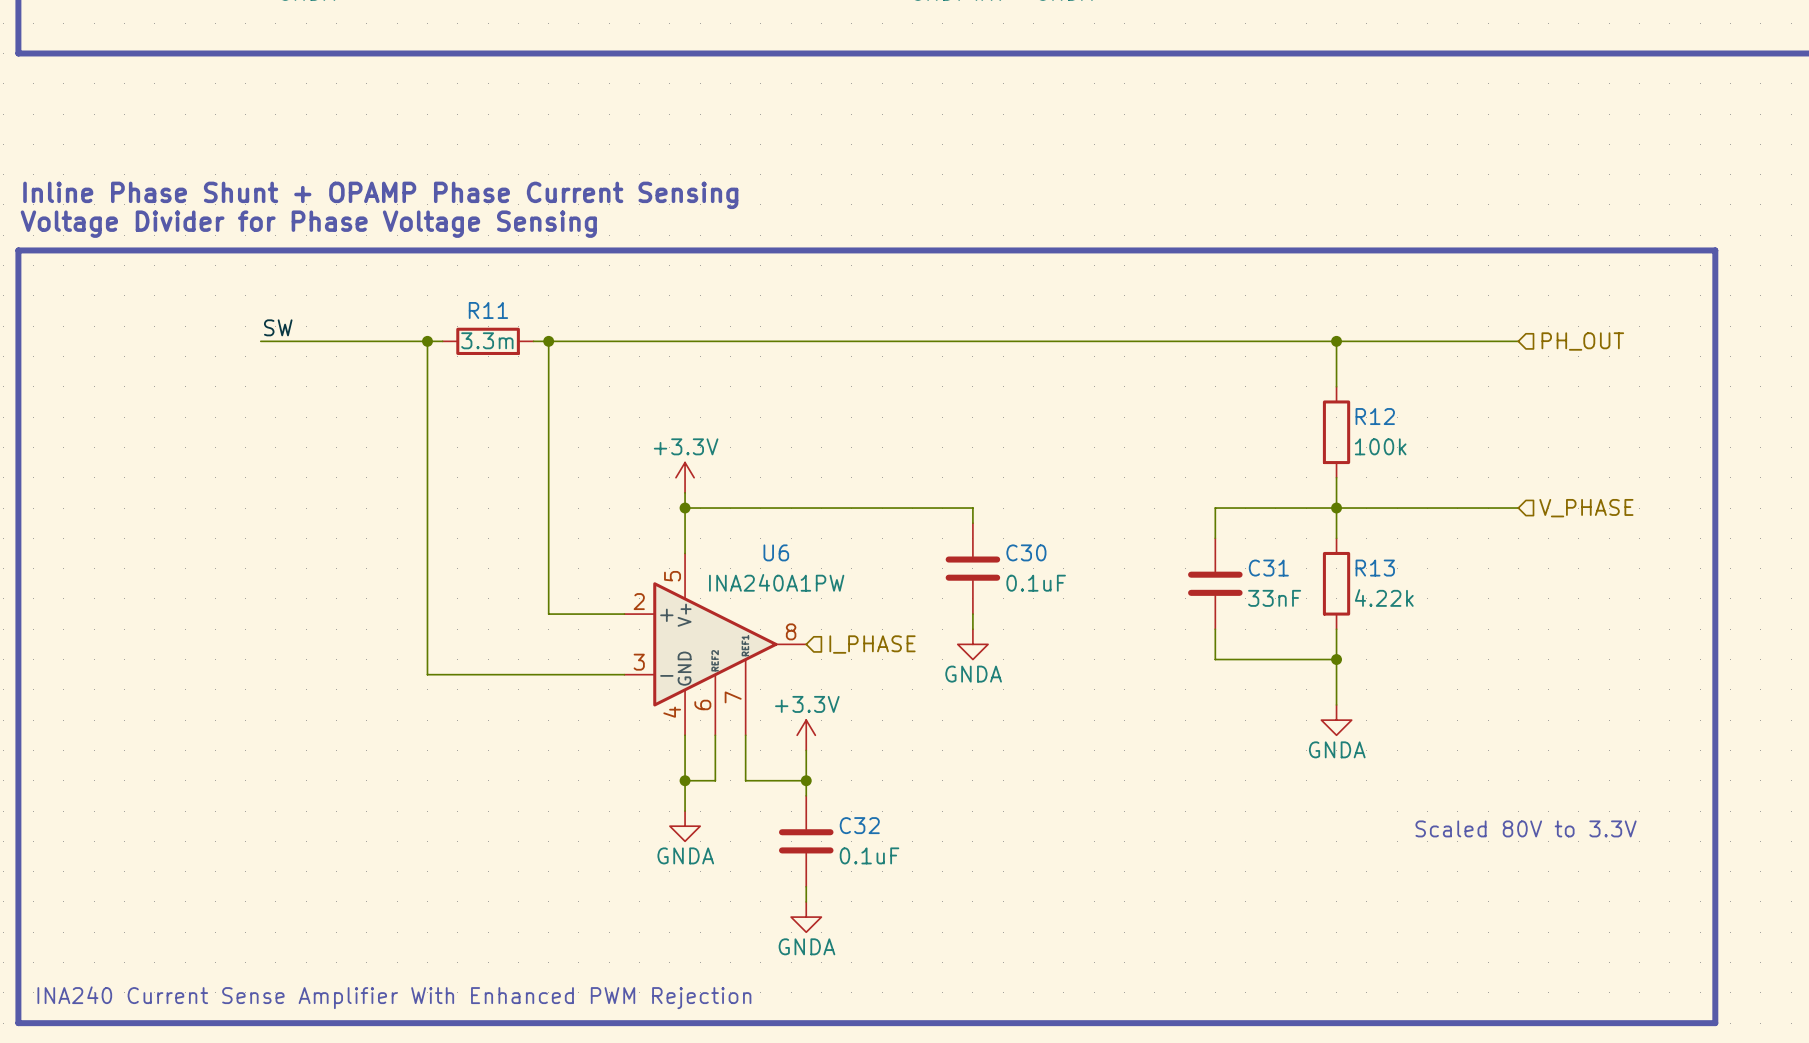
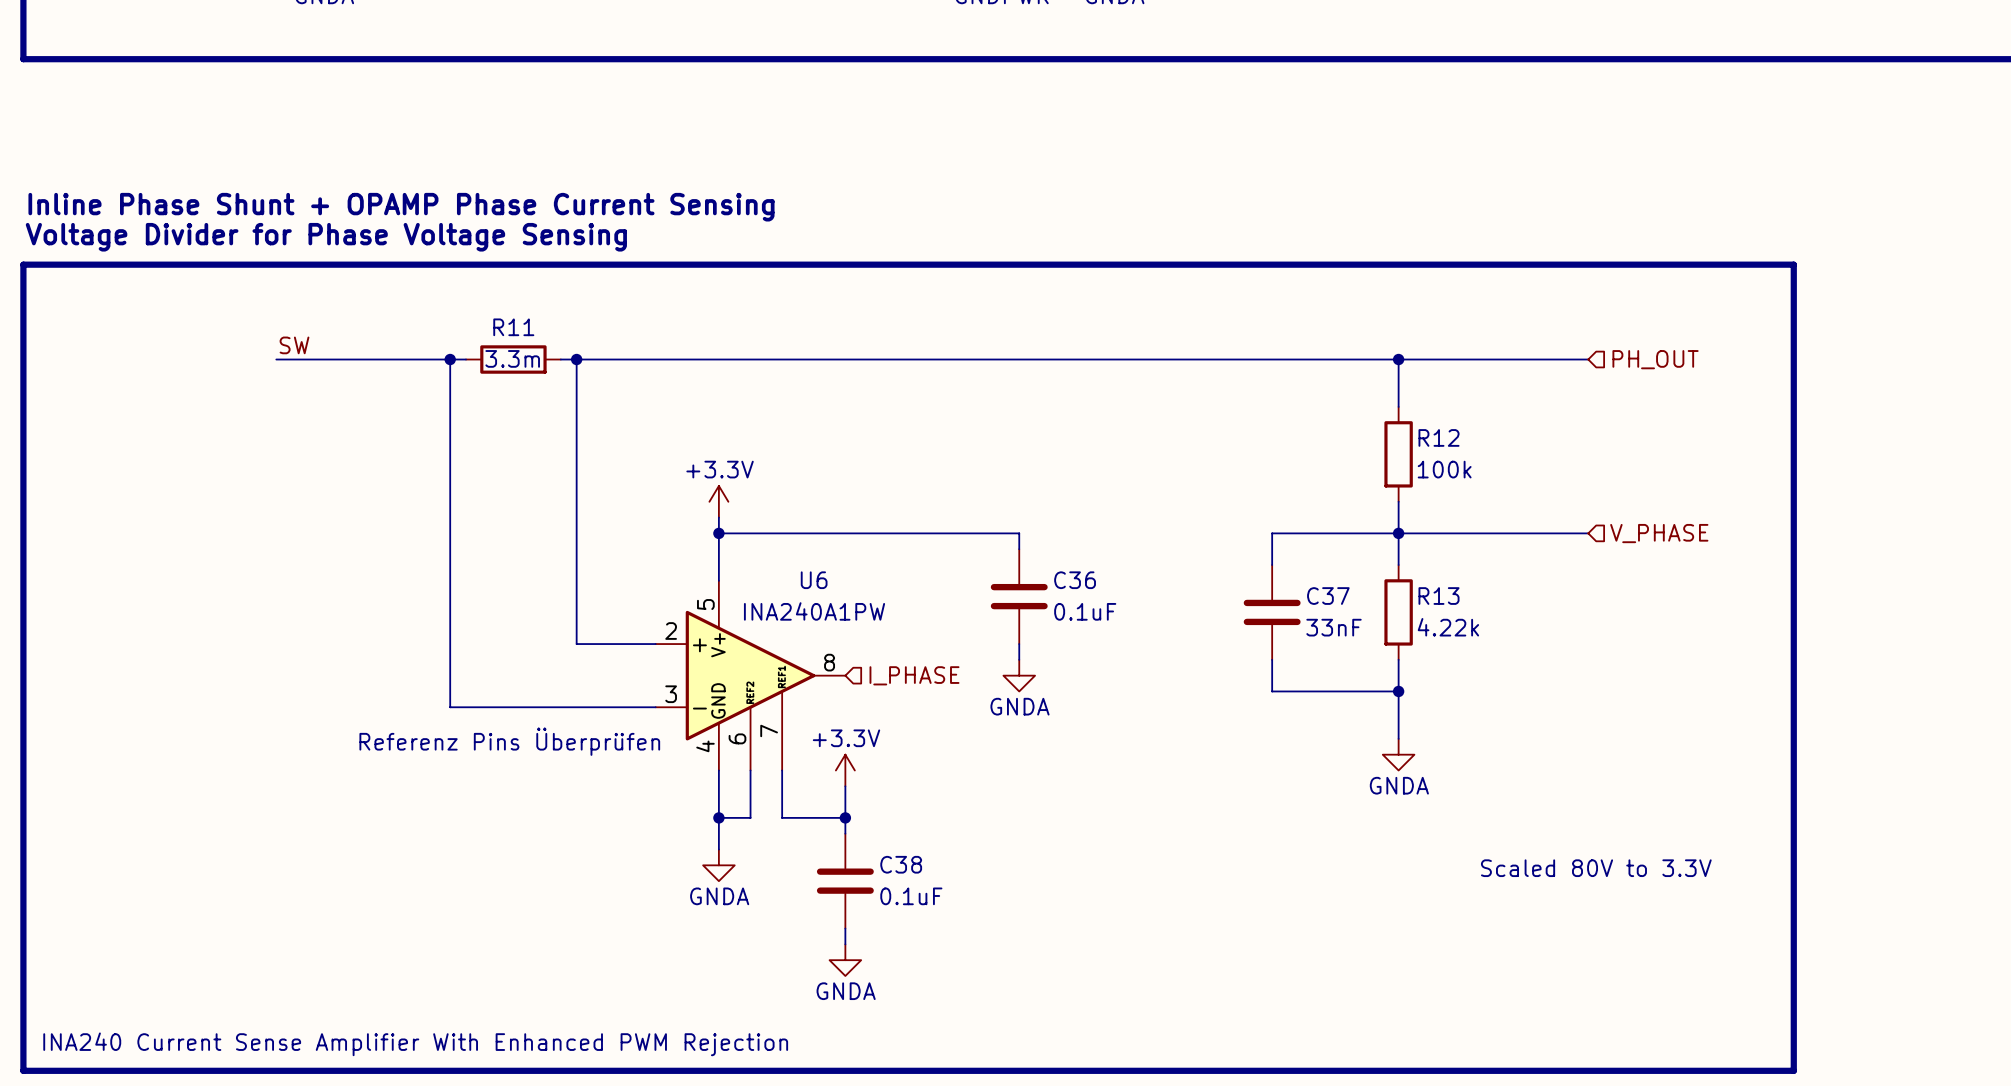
C30 name: C30 (1026, 552) -> C36 (1075, 580)
C31 name: C31 (1268, 568) -> C37 (1328, 596)
text: none -> Referenz Pins Überprüfen (509, 741)
C32 name: C32 (859, 825) -> C38 (901, 864)

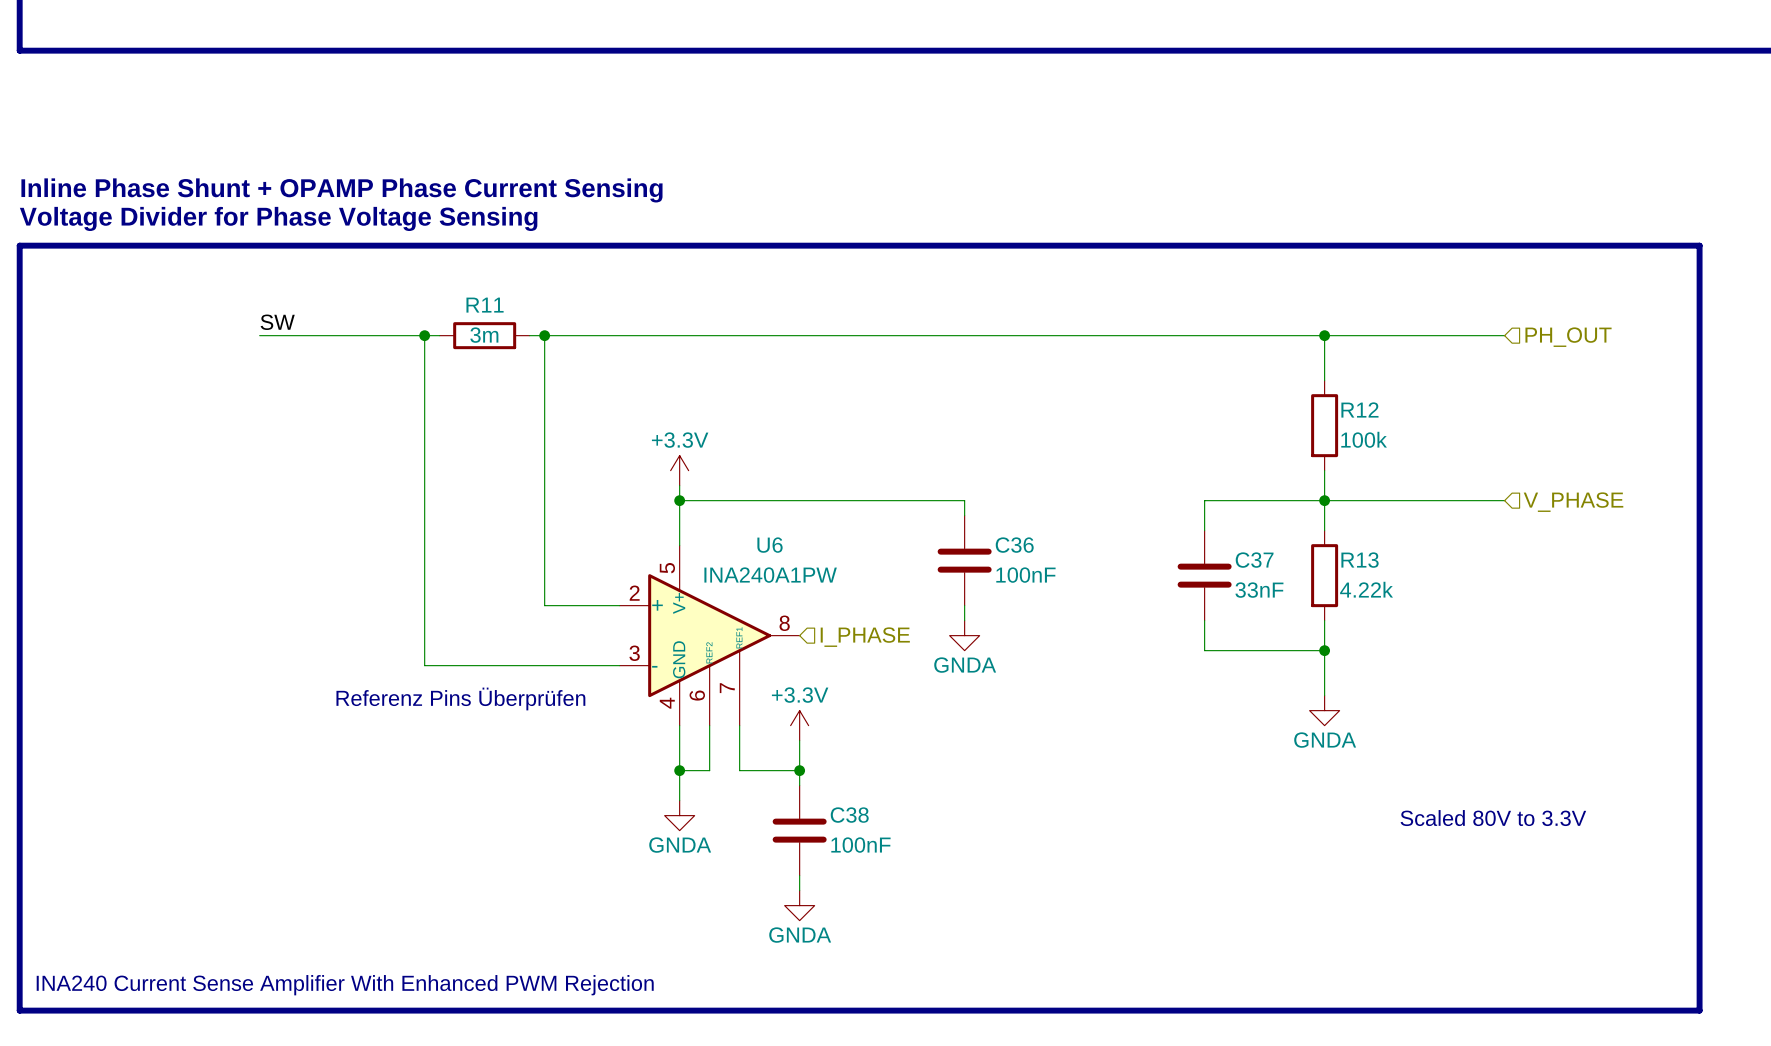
R11 value: 3.3m (512, 358) -> 3m (484, 335)
C36 value: 0.1uF (1085, 611) -> 100nF (1025, 575)
C38 value: 0.1uF (911, 896) -> 100nF (860, 845)

